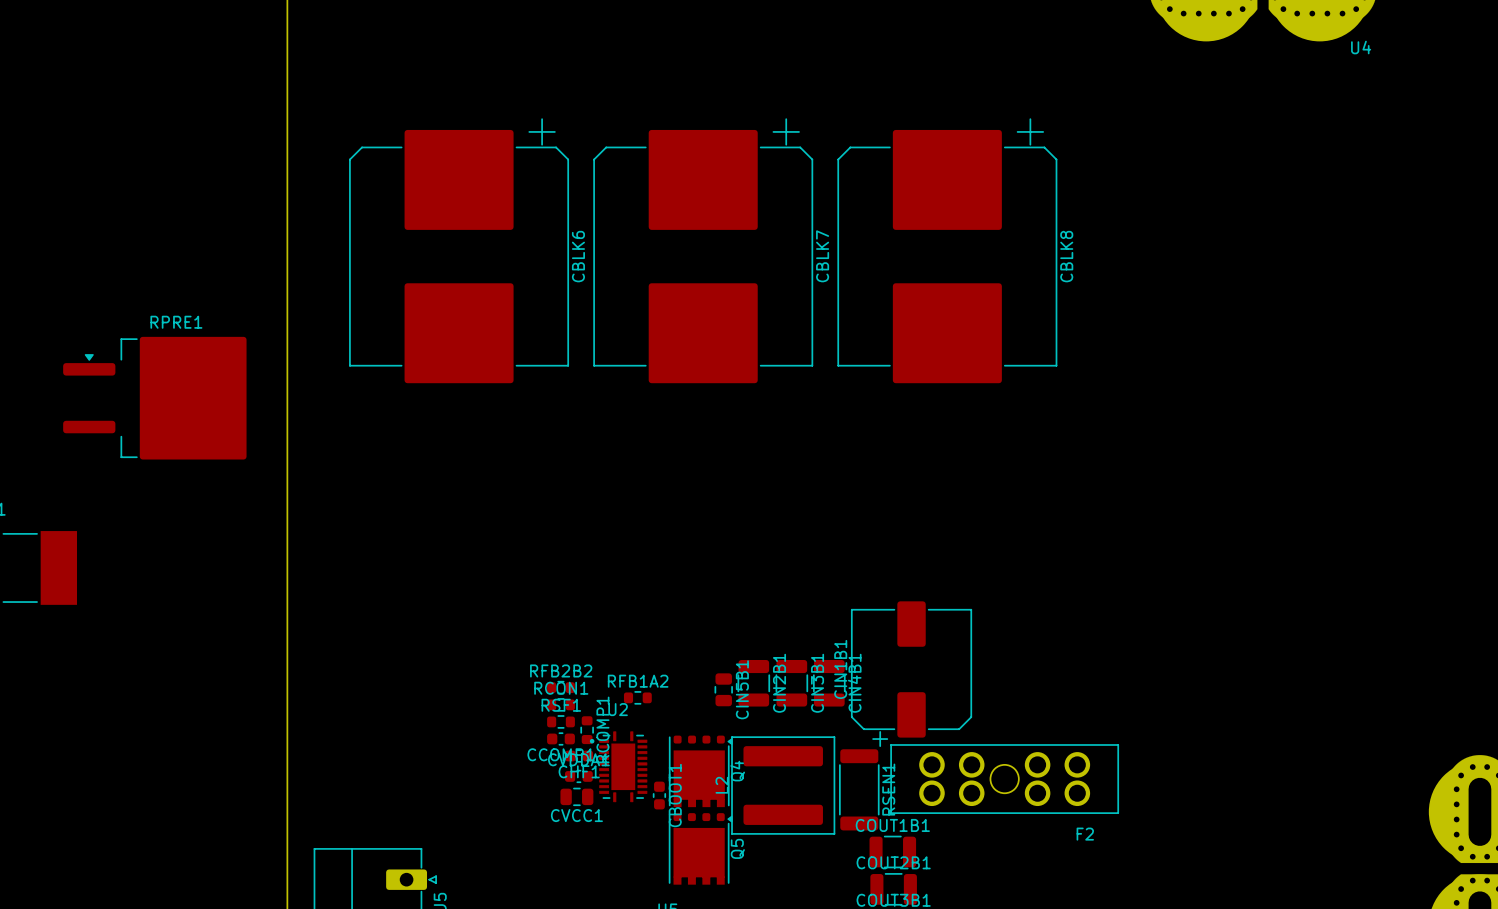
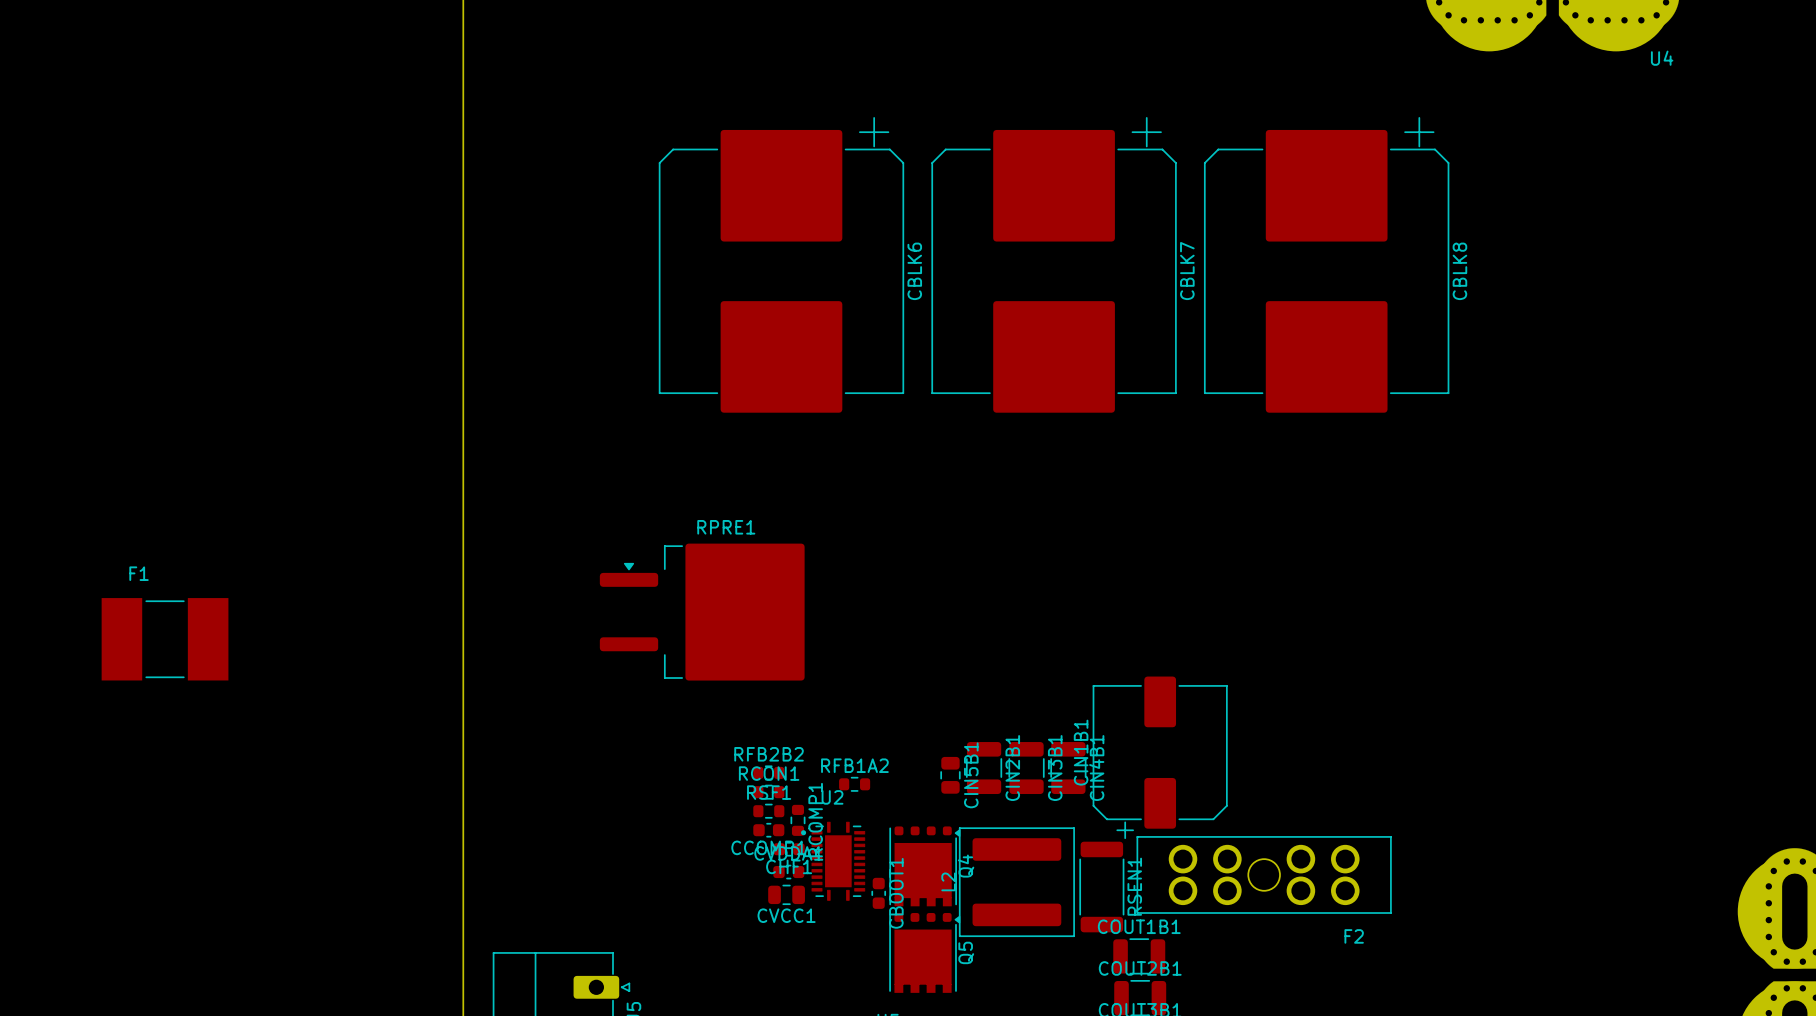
CBLK6 position: (459, 250) -> (781, 264)
CBLK7 position: (703, 250) -> (1054, 264)
CBLK8 position: (947, 250) -> (1326, 264)
RPRE1 position: (154, 398) -> (702, 612)

